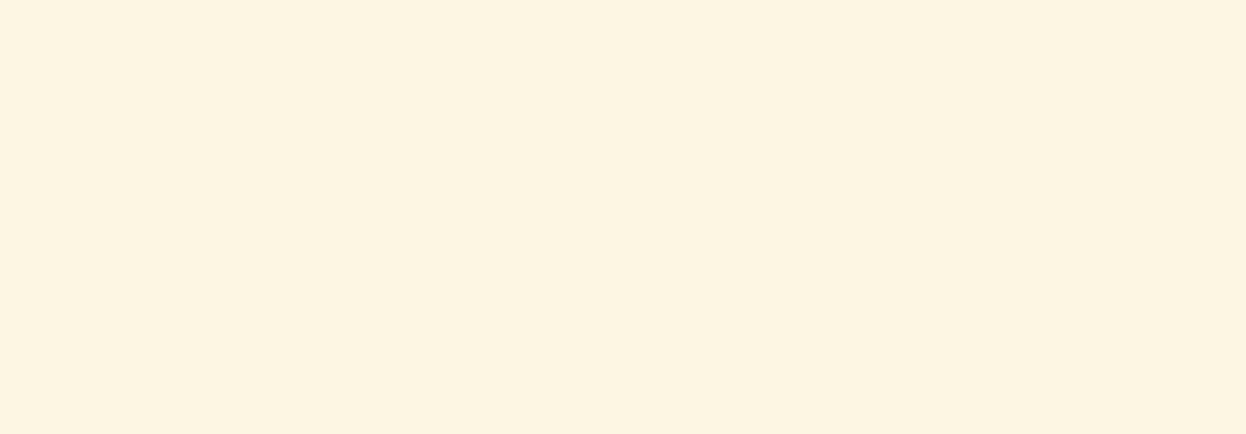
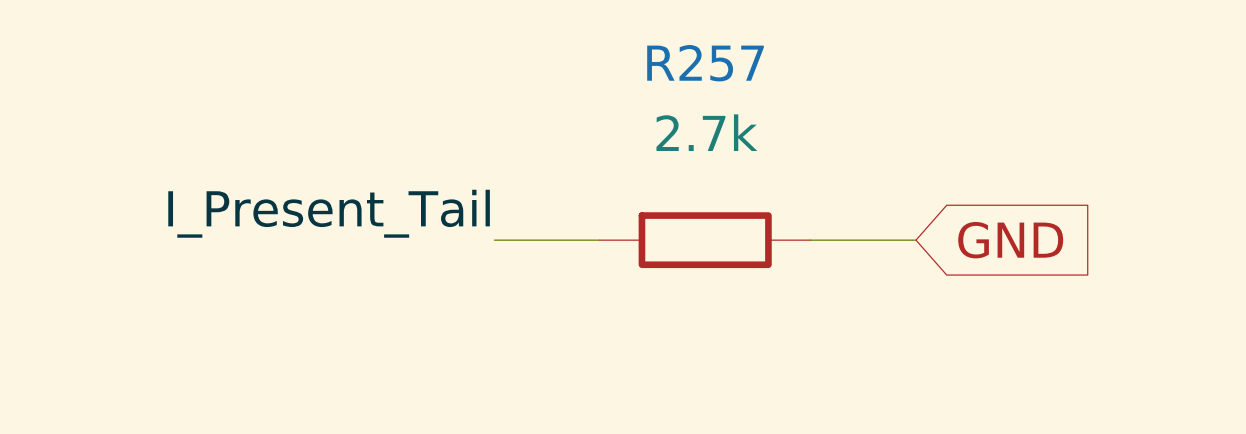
label: none -> I_Present_Tail (329, 213)
wire: none -> (494, 240) (599, 240)
R257: none -> 2.7k (705, 240)
wire: none -> (810, 240) (915, 240)
global label: none -> GND (1010, 240)

